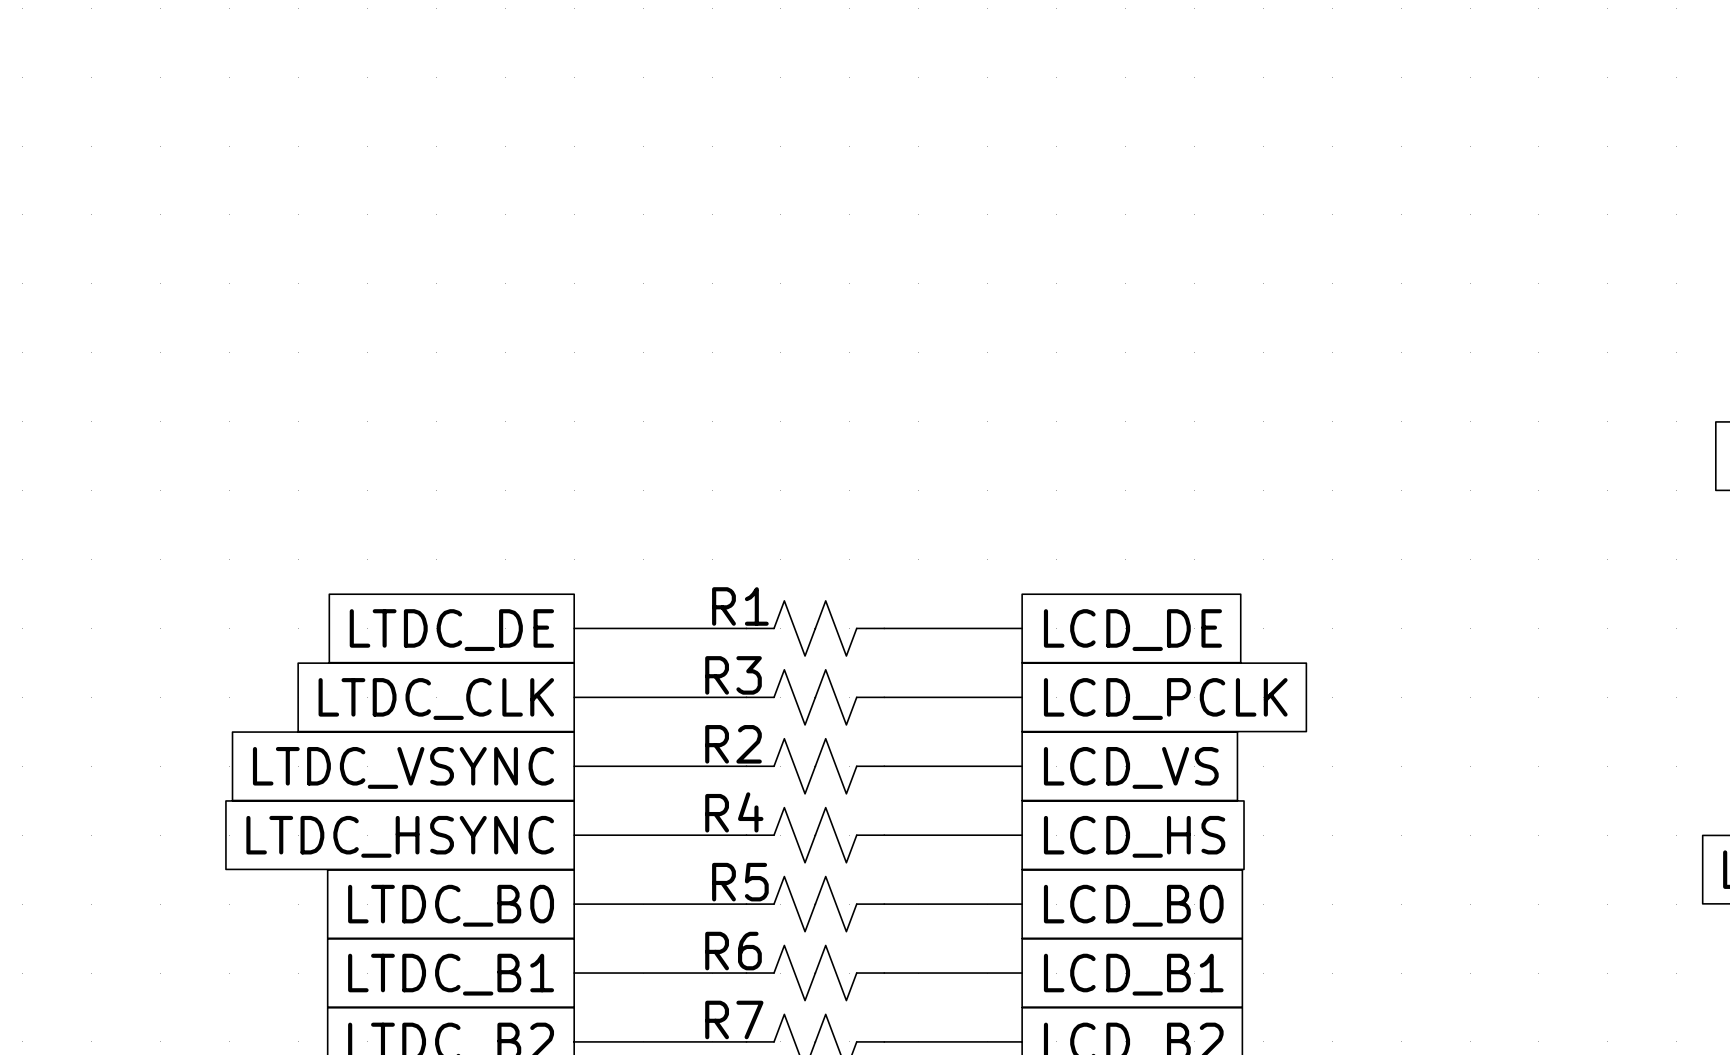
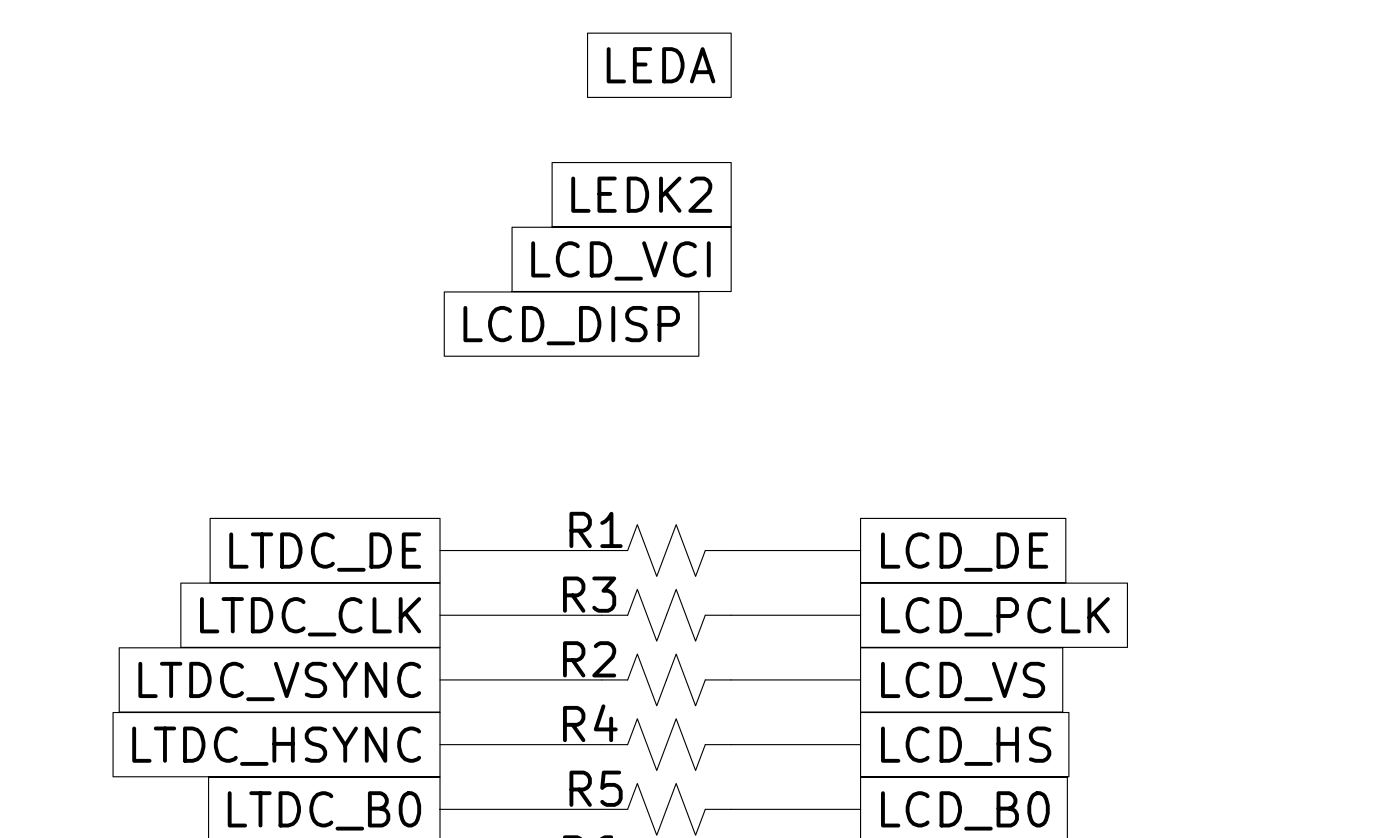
global label: none -> LEDA (661, 65)
global label: none -> LEDK2 (641, 194)
global label: none -> LCD_VCI (620, 260)
global label: none -> LCD_DISP (571, 325)

